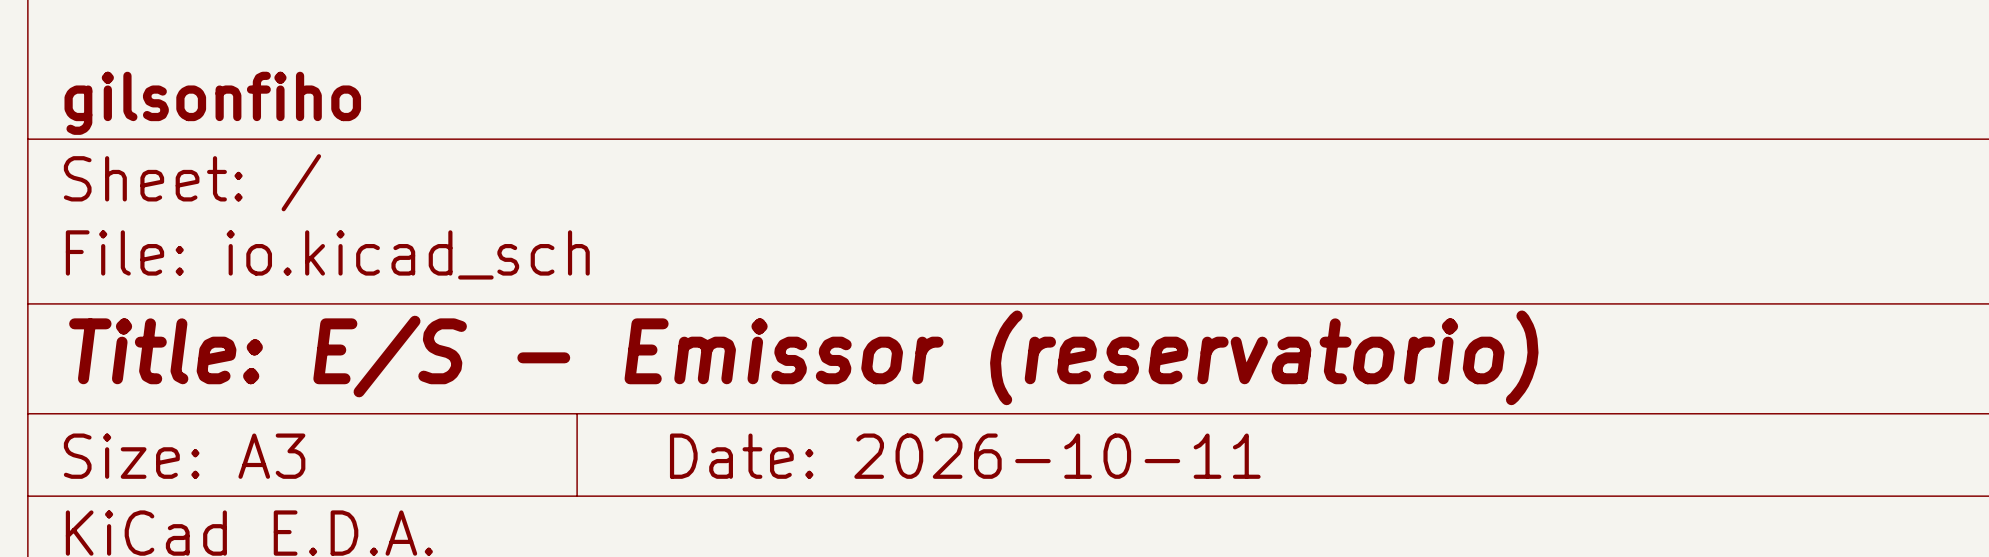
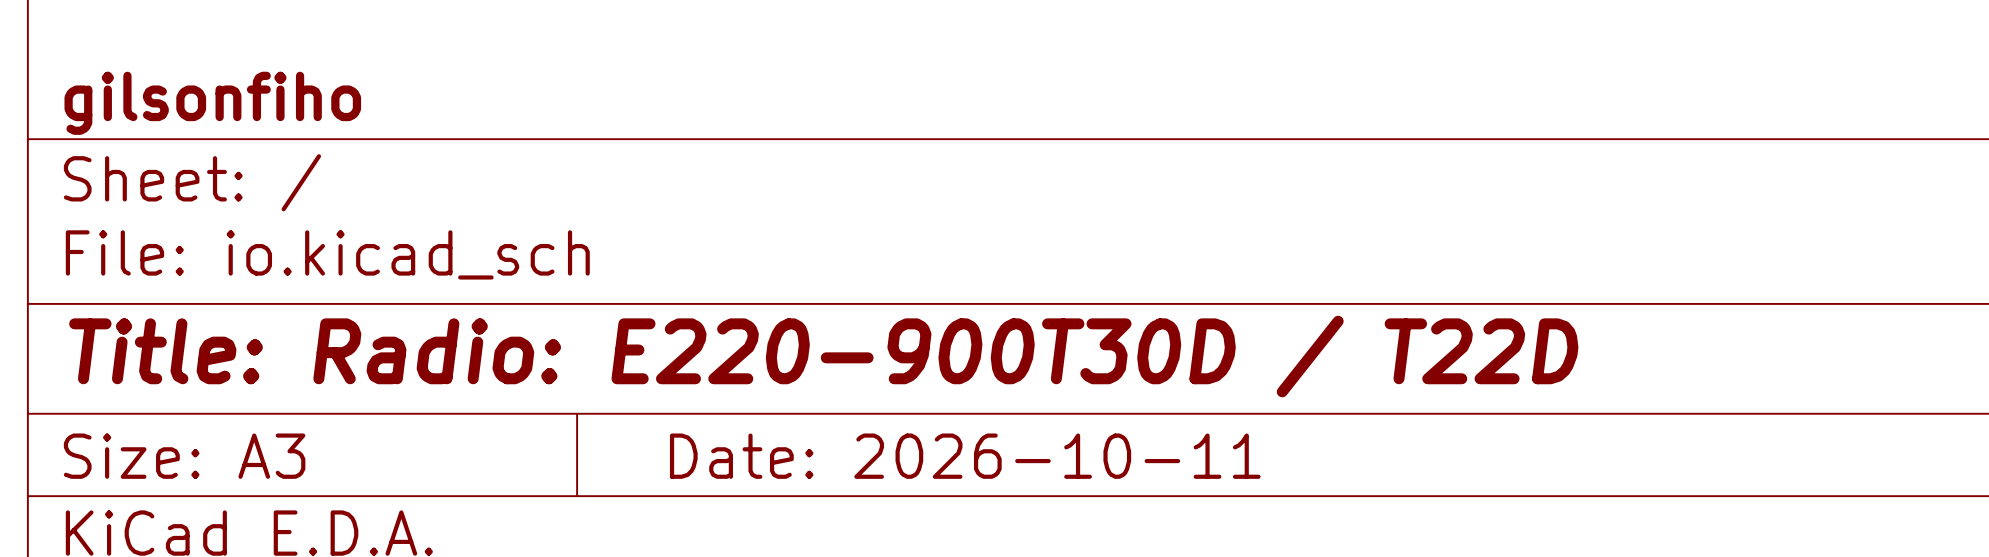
title block: Title: E/S - Emissor (reservatorio) (803, 357) -> Title: Radio: E220-900T30D / T22D (823, 356)

